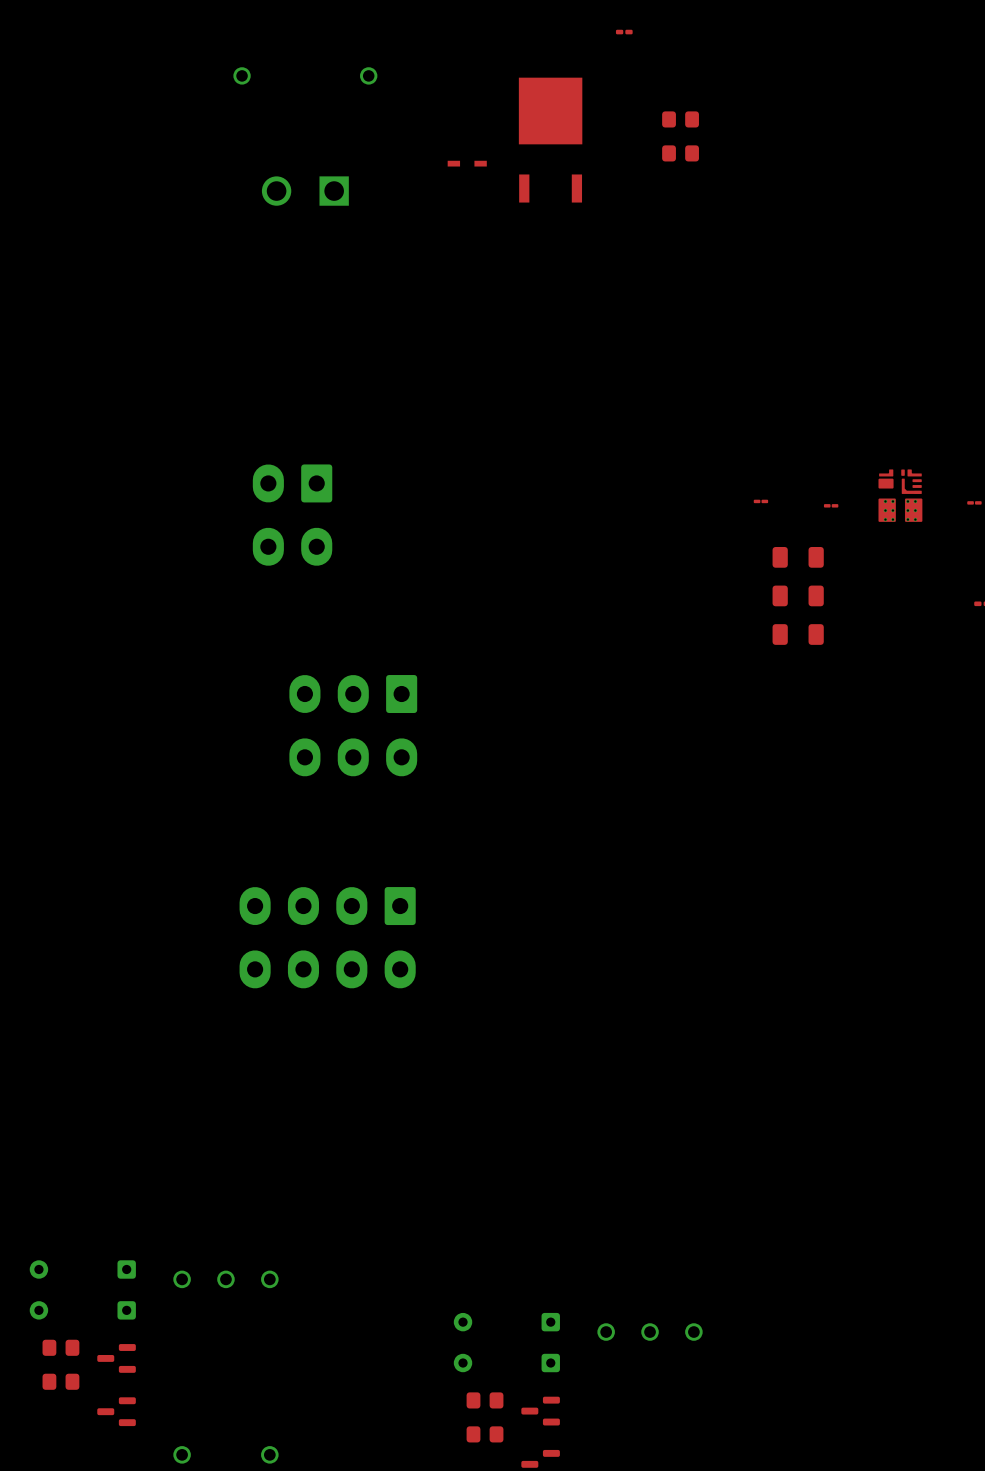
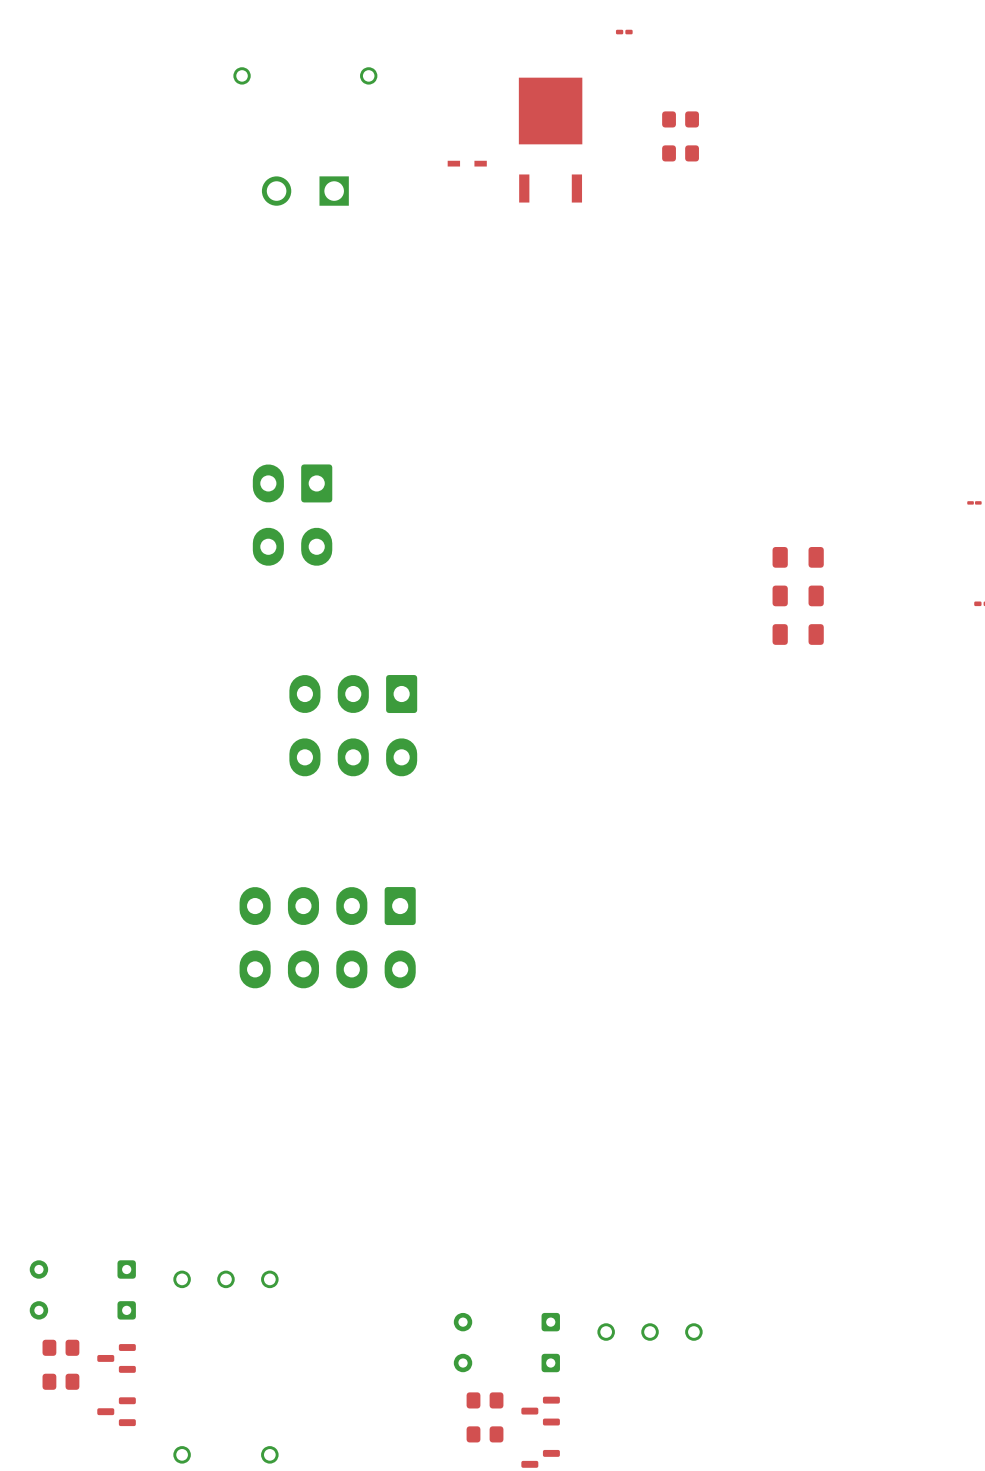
part: (900, 495) -> none
part: (760, 501) -> none
part: (831, 505) -> none

